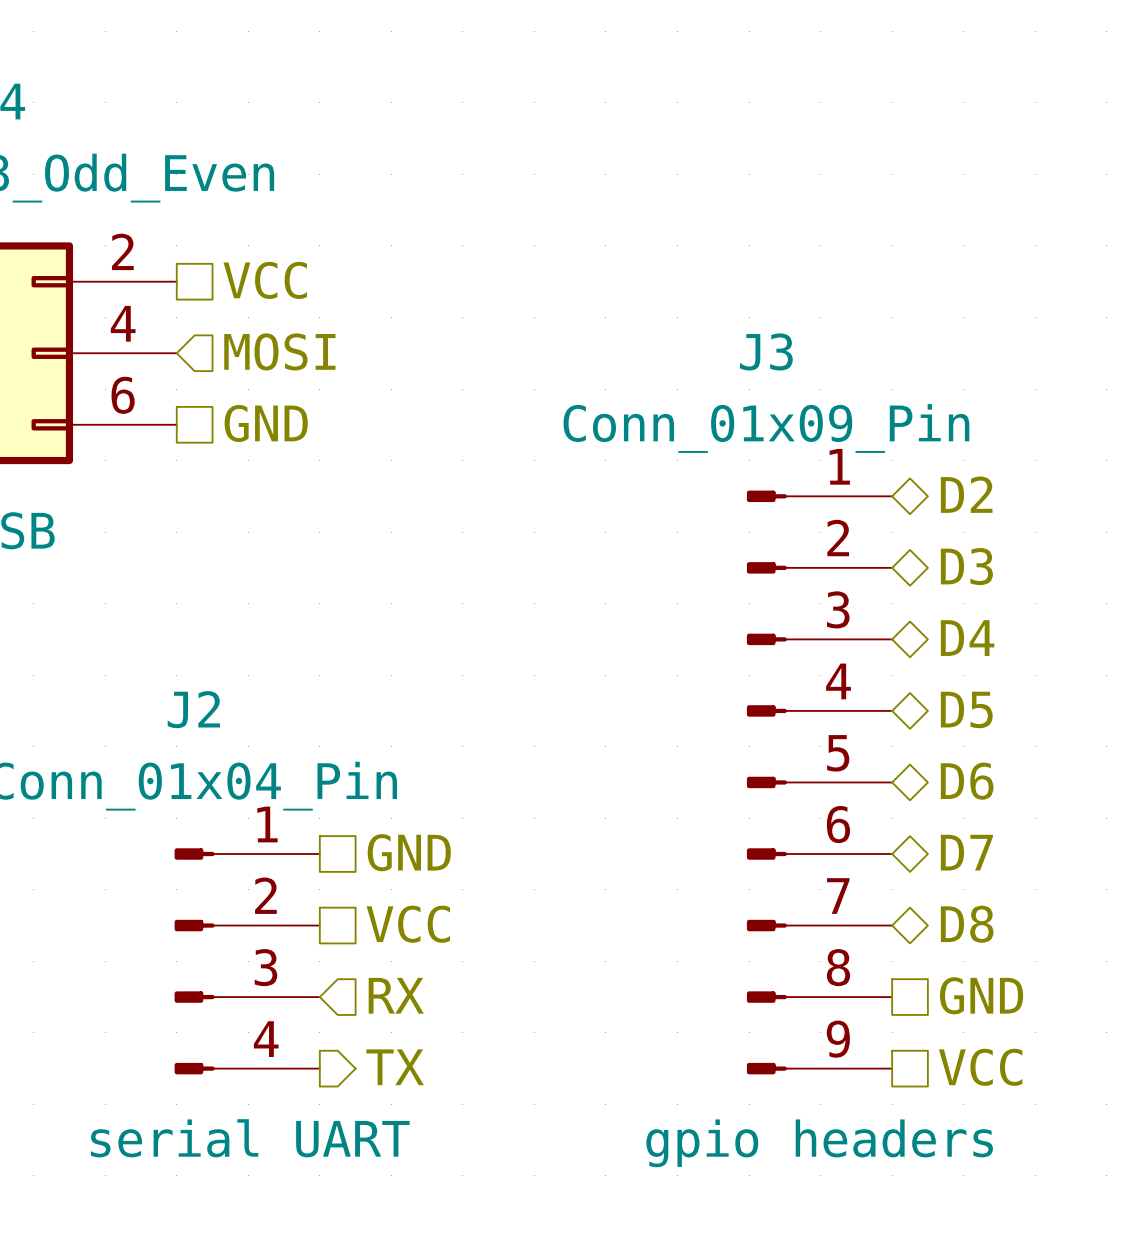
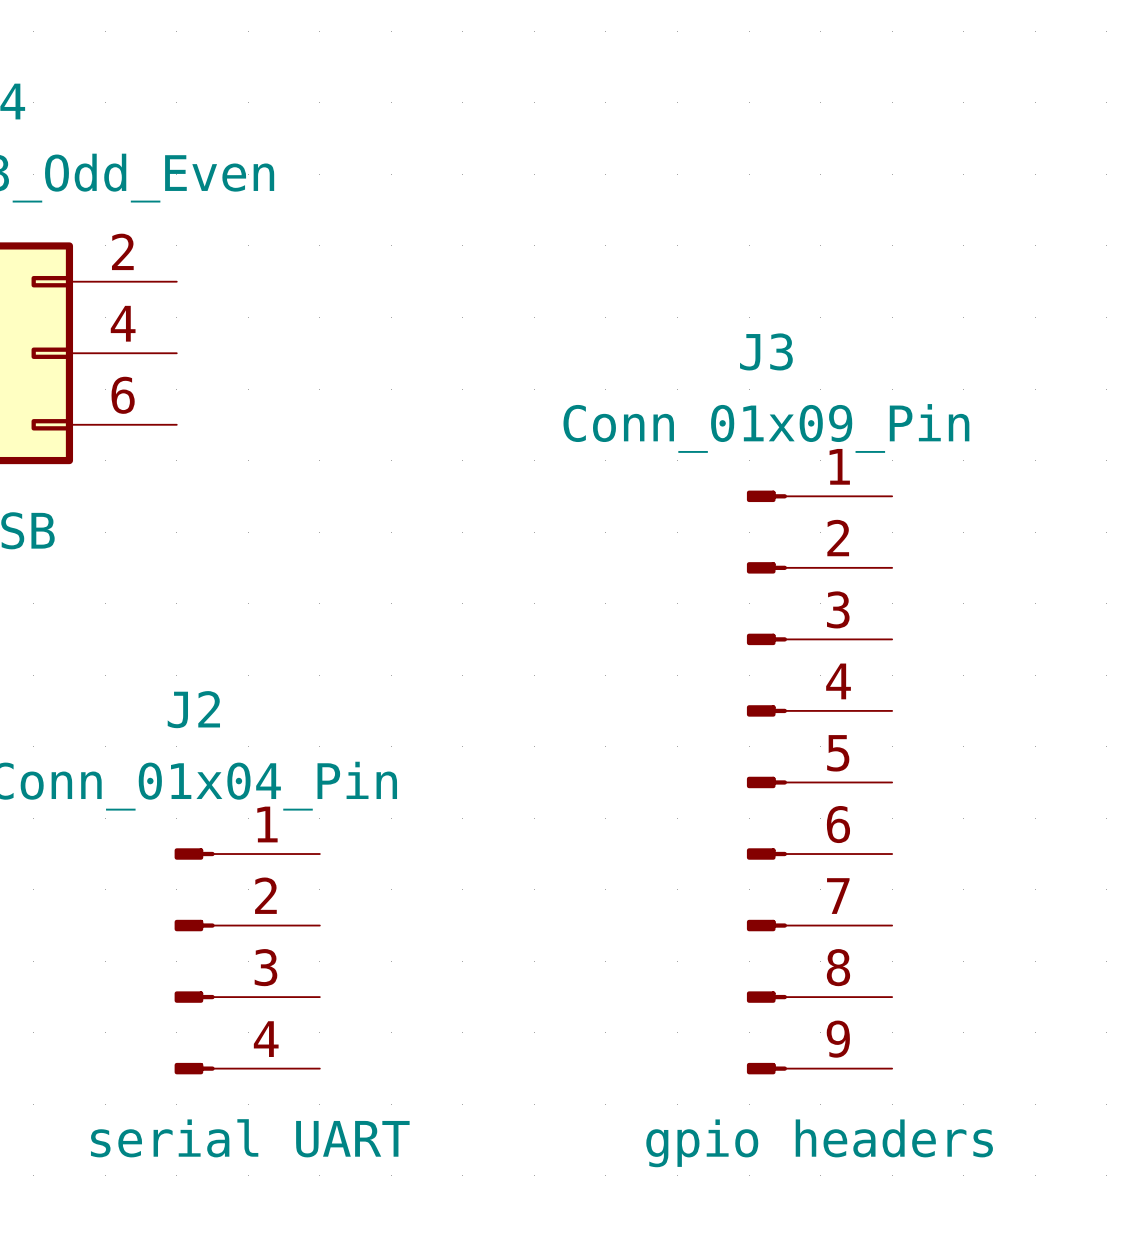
hierarchical label: VCC (265, 280) -> none
hierarchical label: MOSI (279, 351) -> none
hierarchical label: GND (266, 423) -> none
hierarchical label: D2 (966, 494) -> none
hierarchical label: D3 (966, 566) -> none
hierarchical label: D4 (967, 638) -> none
hierarchical label: D5 (966, 709) -> none
hierarchical label: D6 (967, 781) -> none
hierarchical label: GND (409, 852) -> none
hierarchical label: D7 (966, 852) -> none
hierarchical label: VCC (408, 924) -> none
hierarchical label: D8 (967, 924) -> none
hierarchical label: RX (396, 995) -> none
hierarchical label: GND (981, 995) -> none
hierarchical label: TX (395, 1067) -> none
hierarchical label: VCC (980, 1067) -> none

